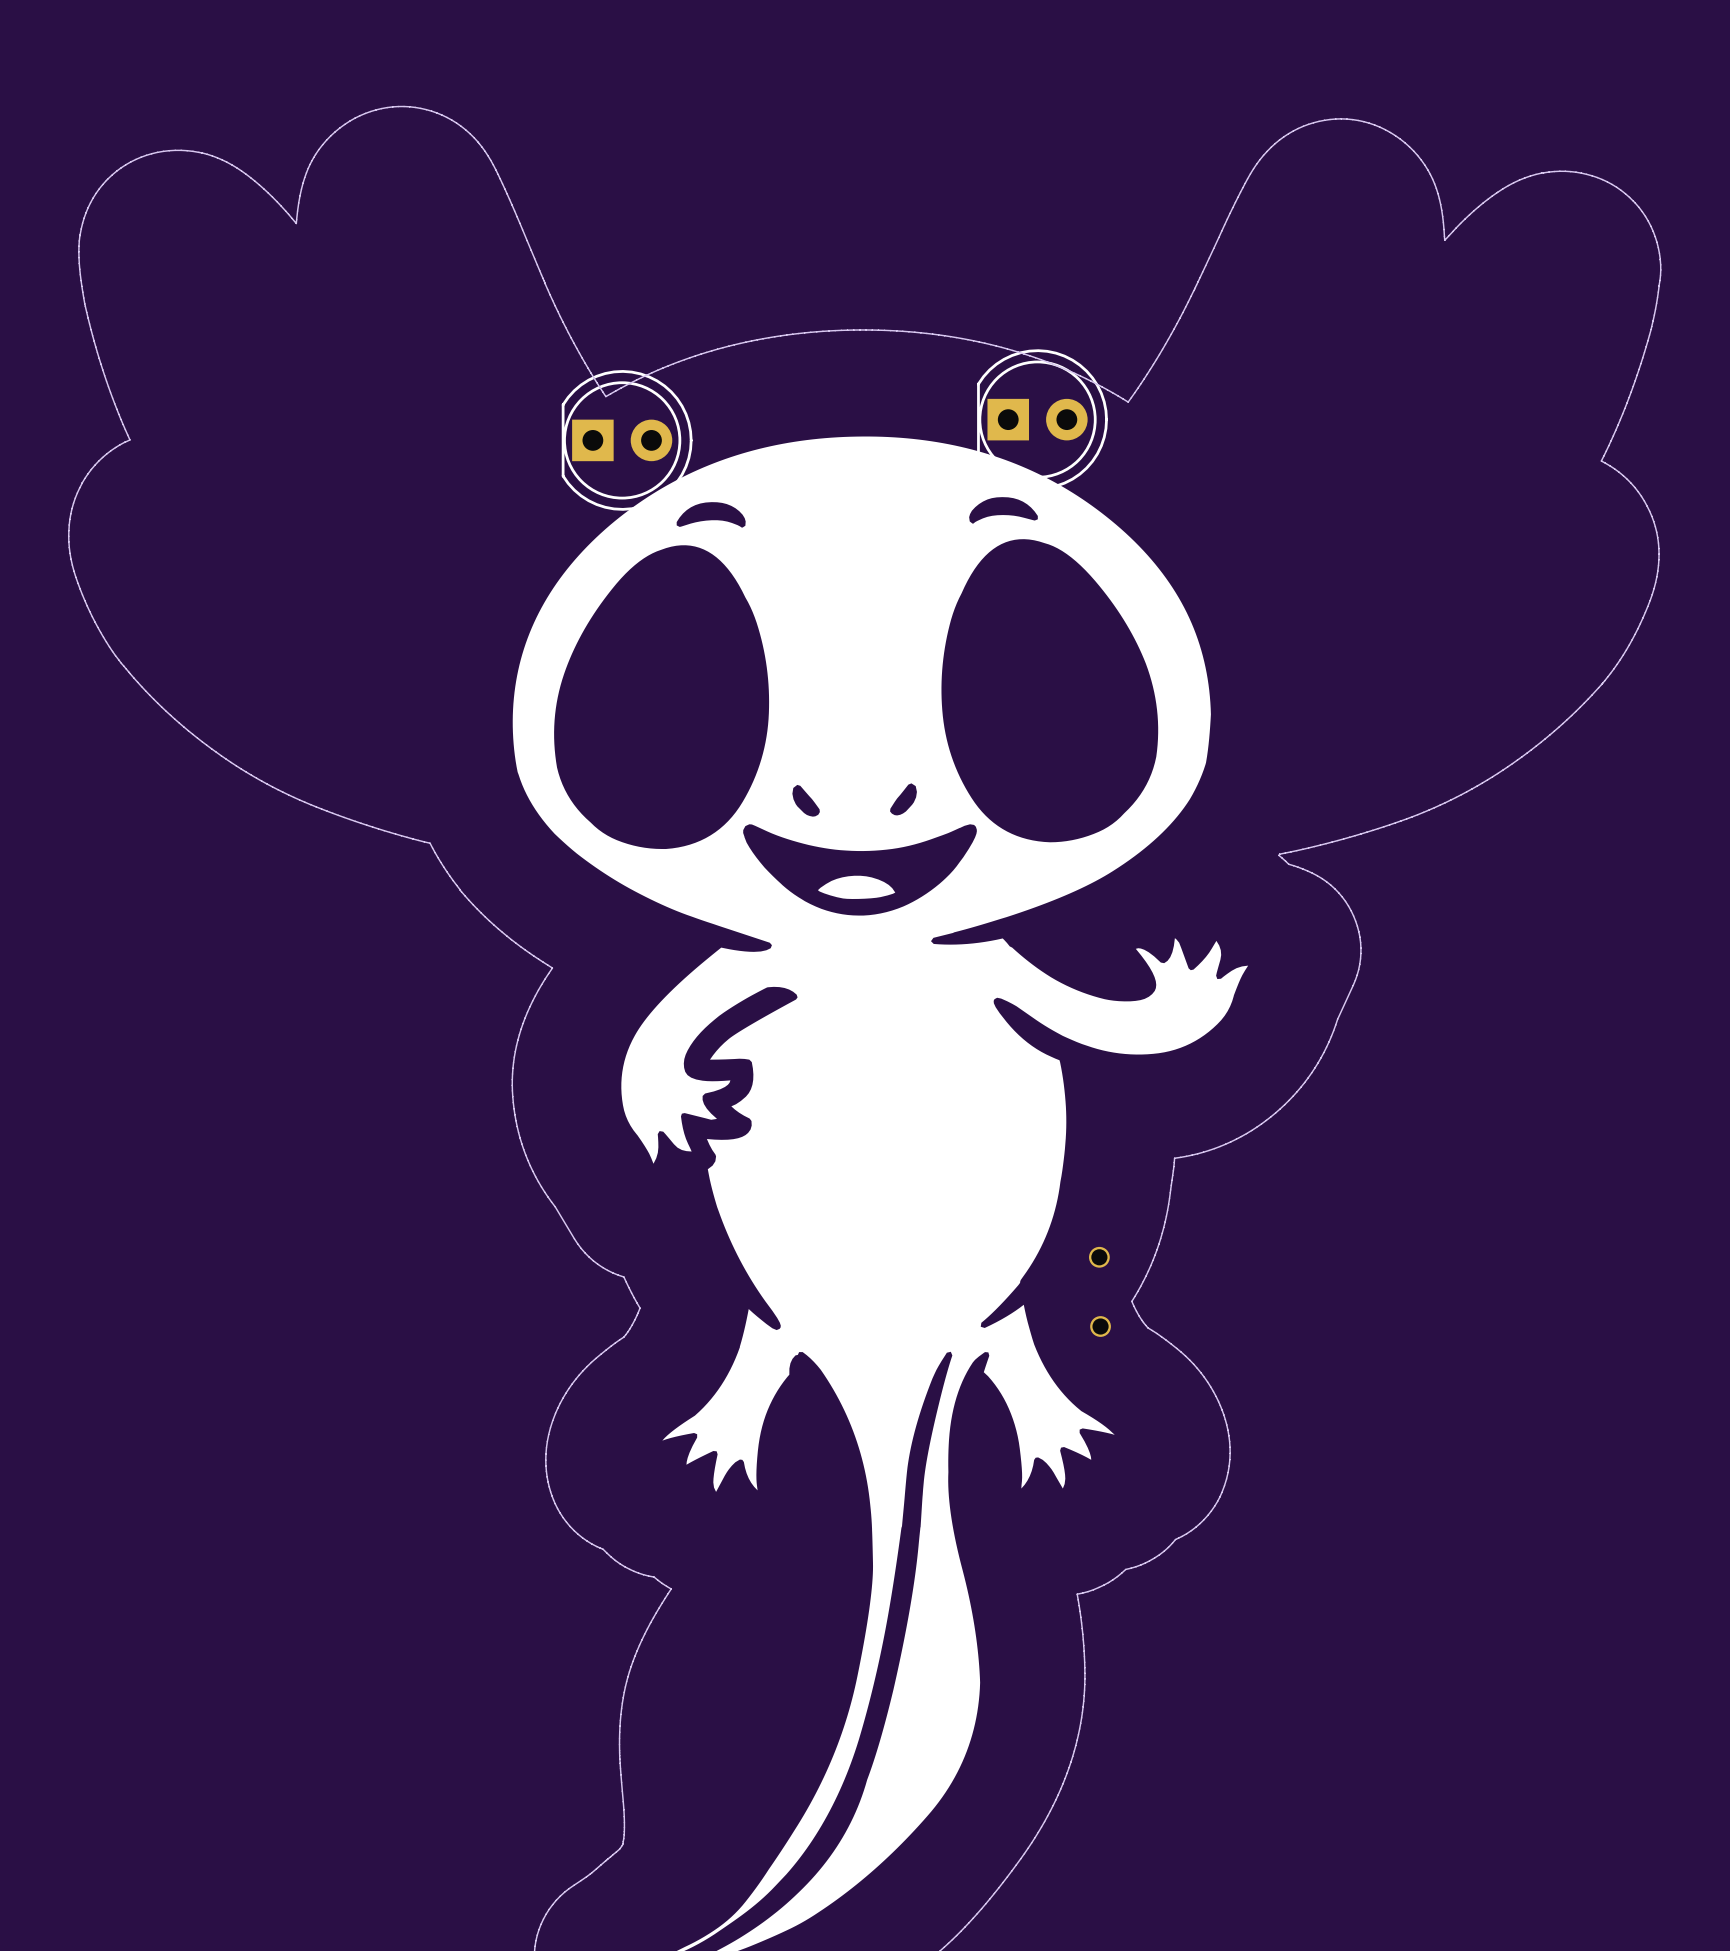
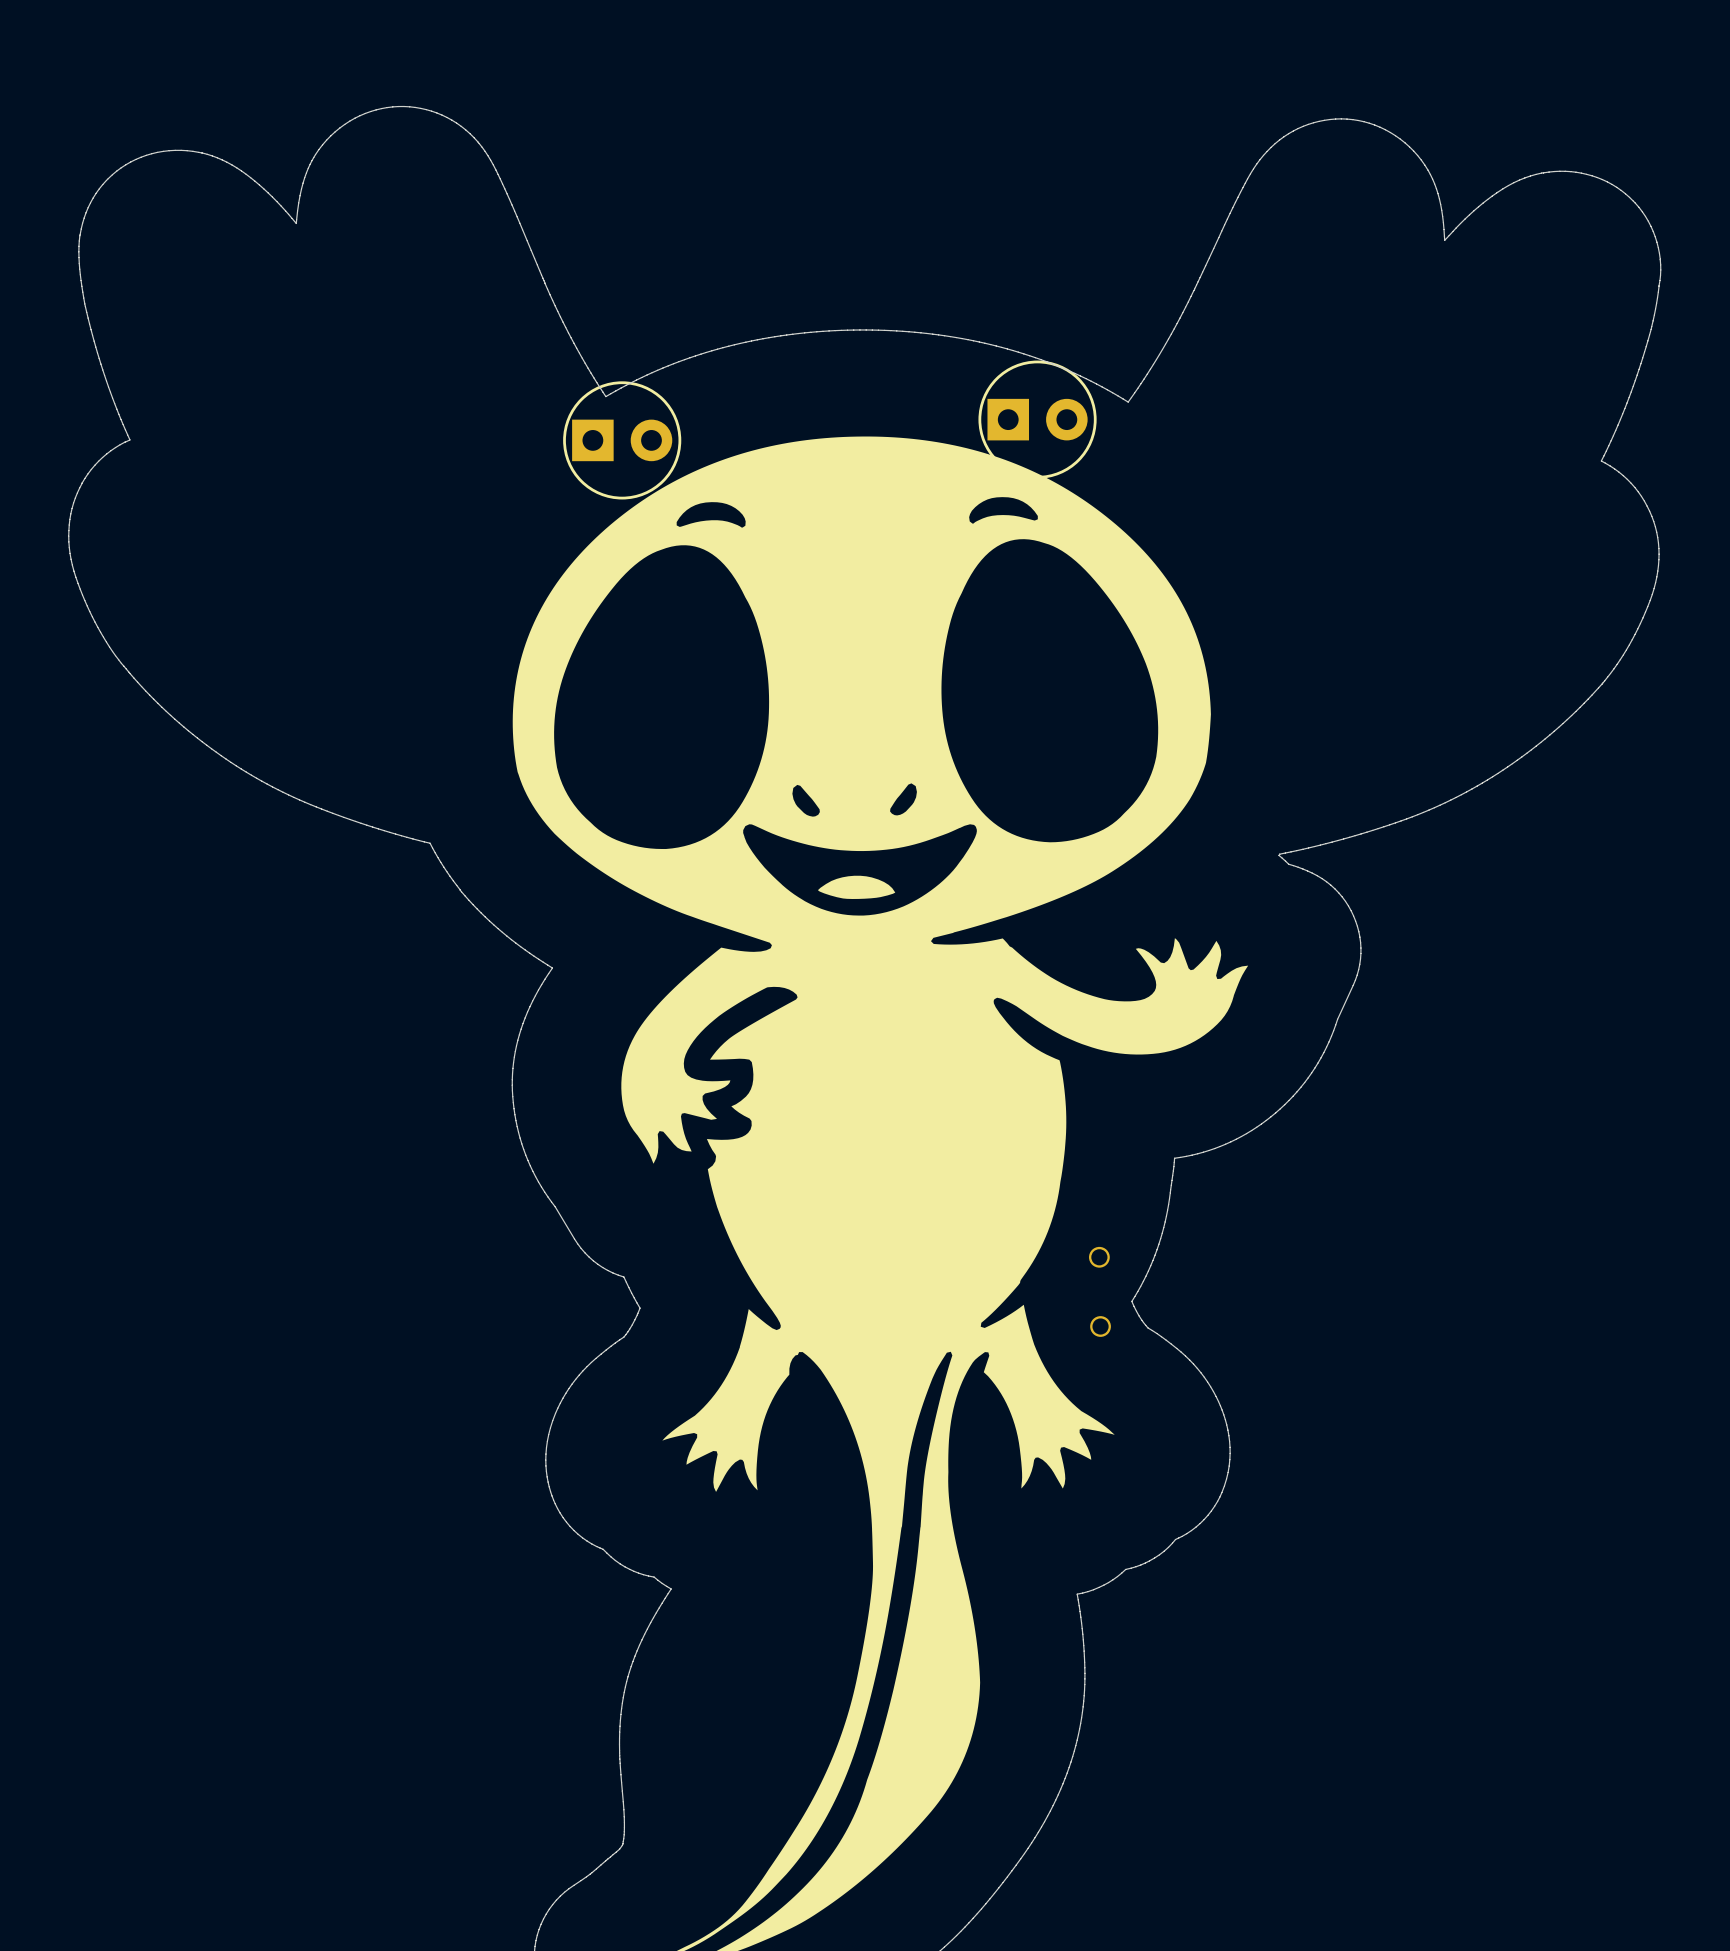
part footprint: [977, 349, 1108, 491] -> [978, 360, 1097, 479]
part footprint: [561, 370, 693, 511] -> [563, 381, 682, 500]

